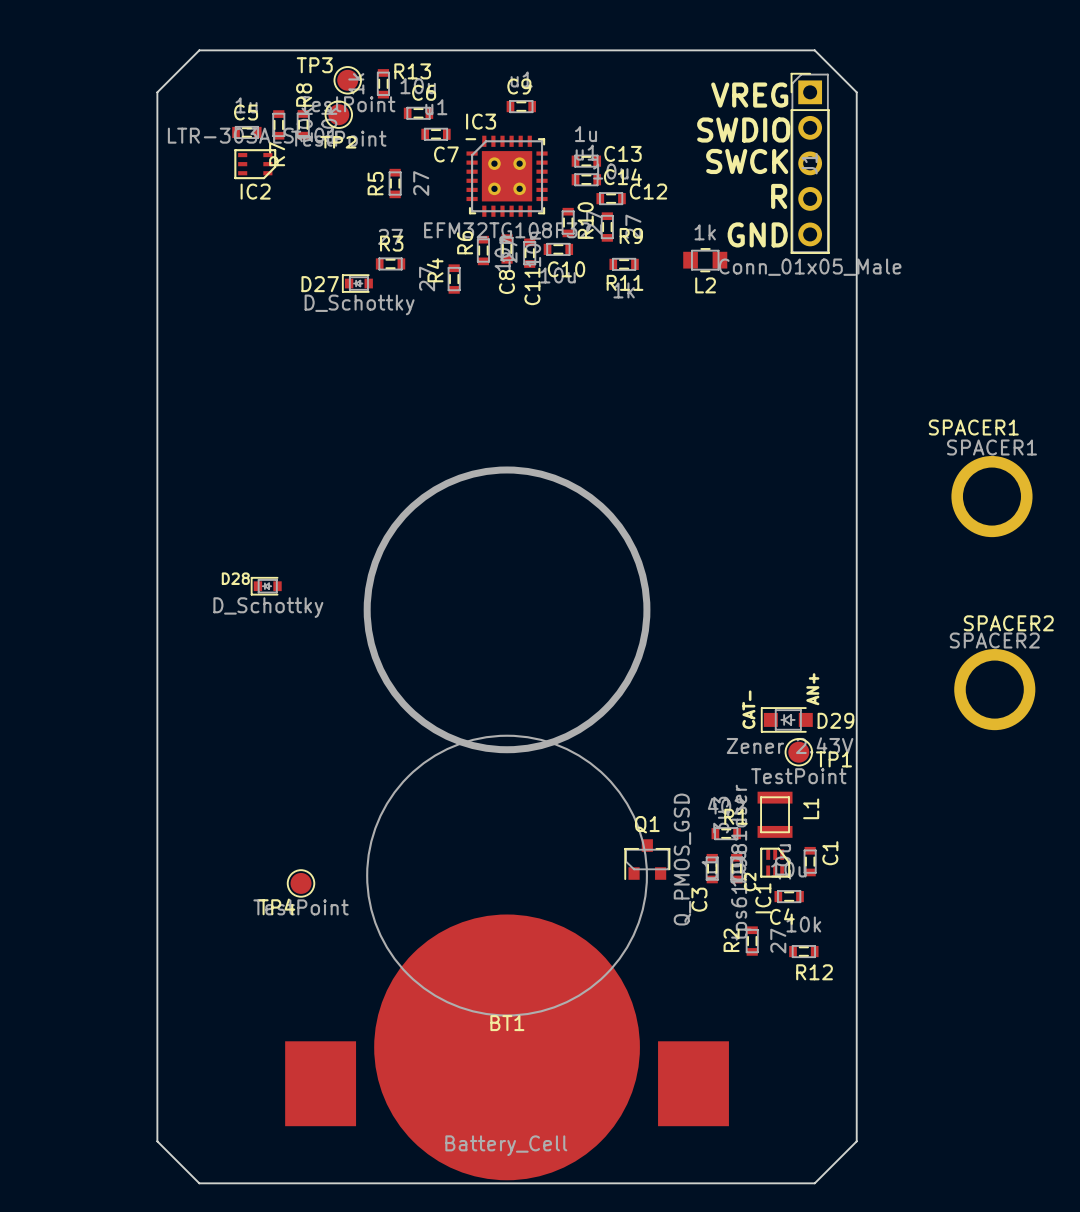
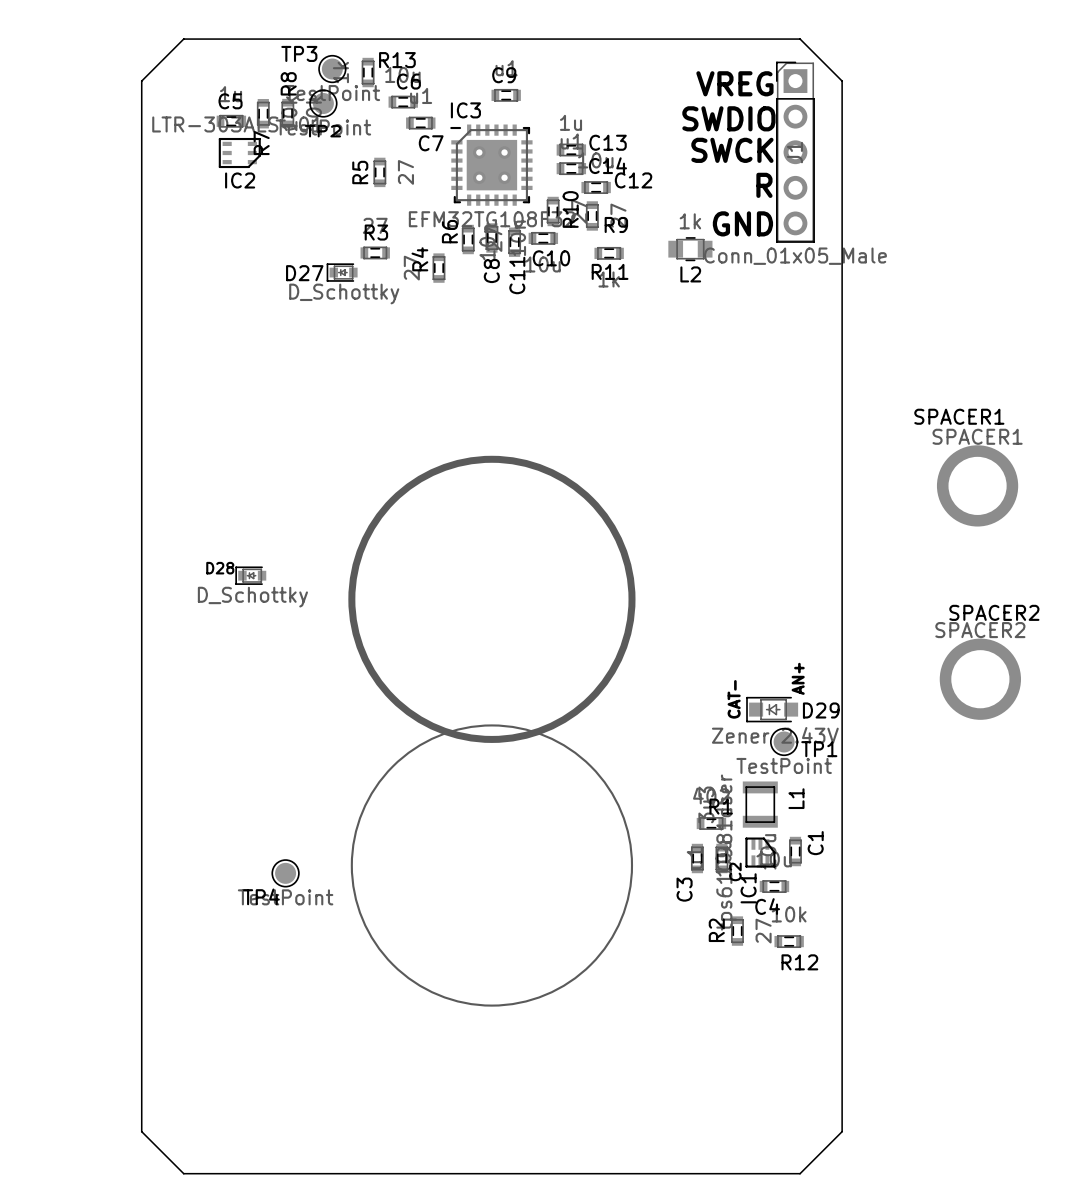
Q1: Q_PMOS_GSD (647, 859) -> none
BT1: Battery_Cell (507, 1047) -> none

